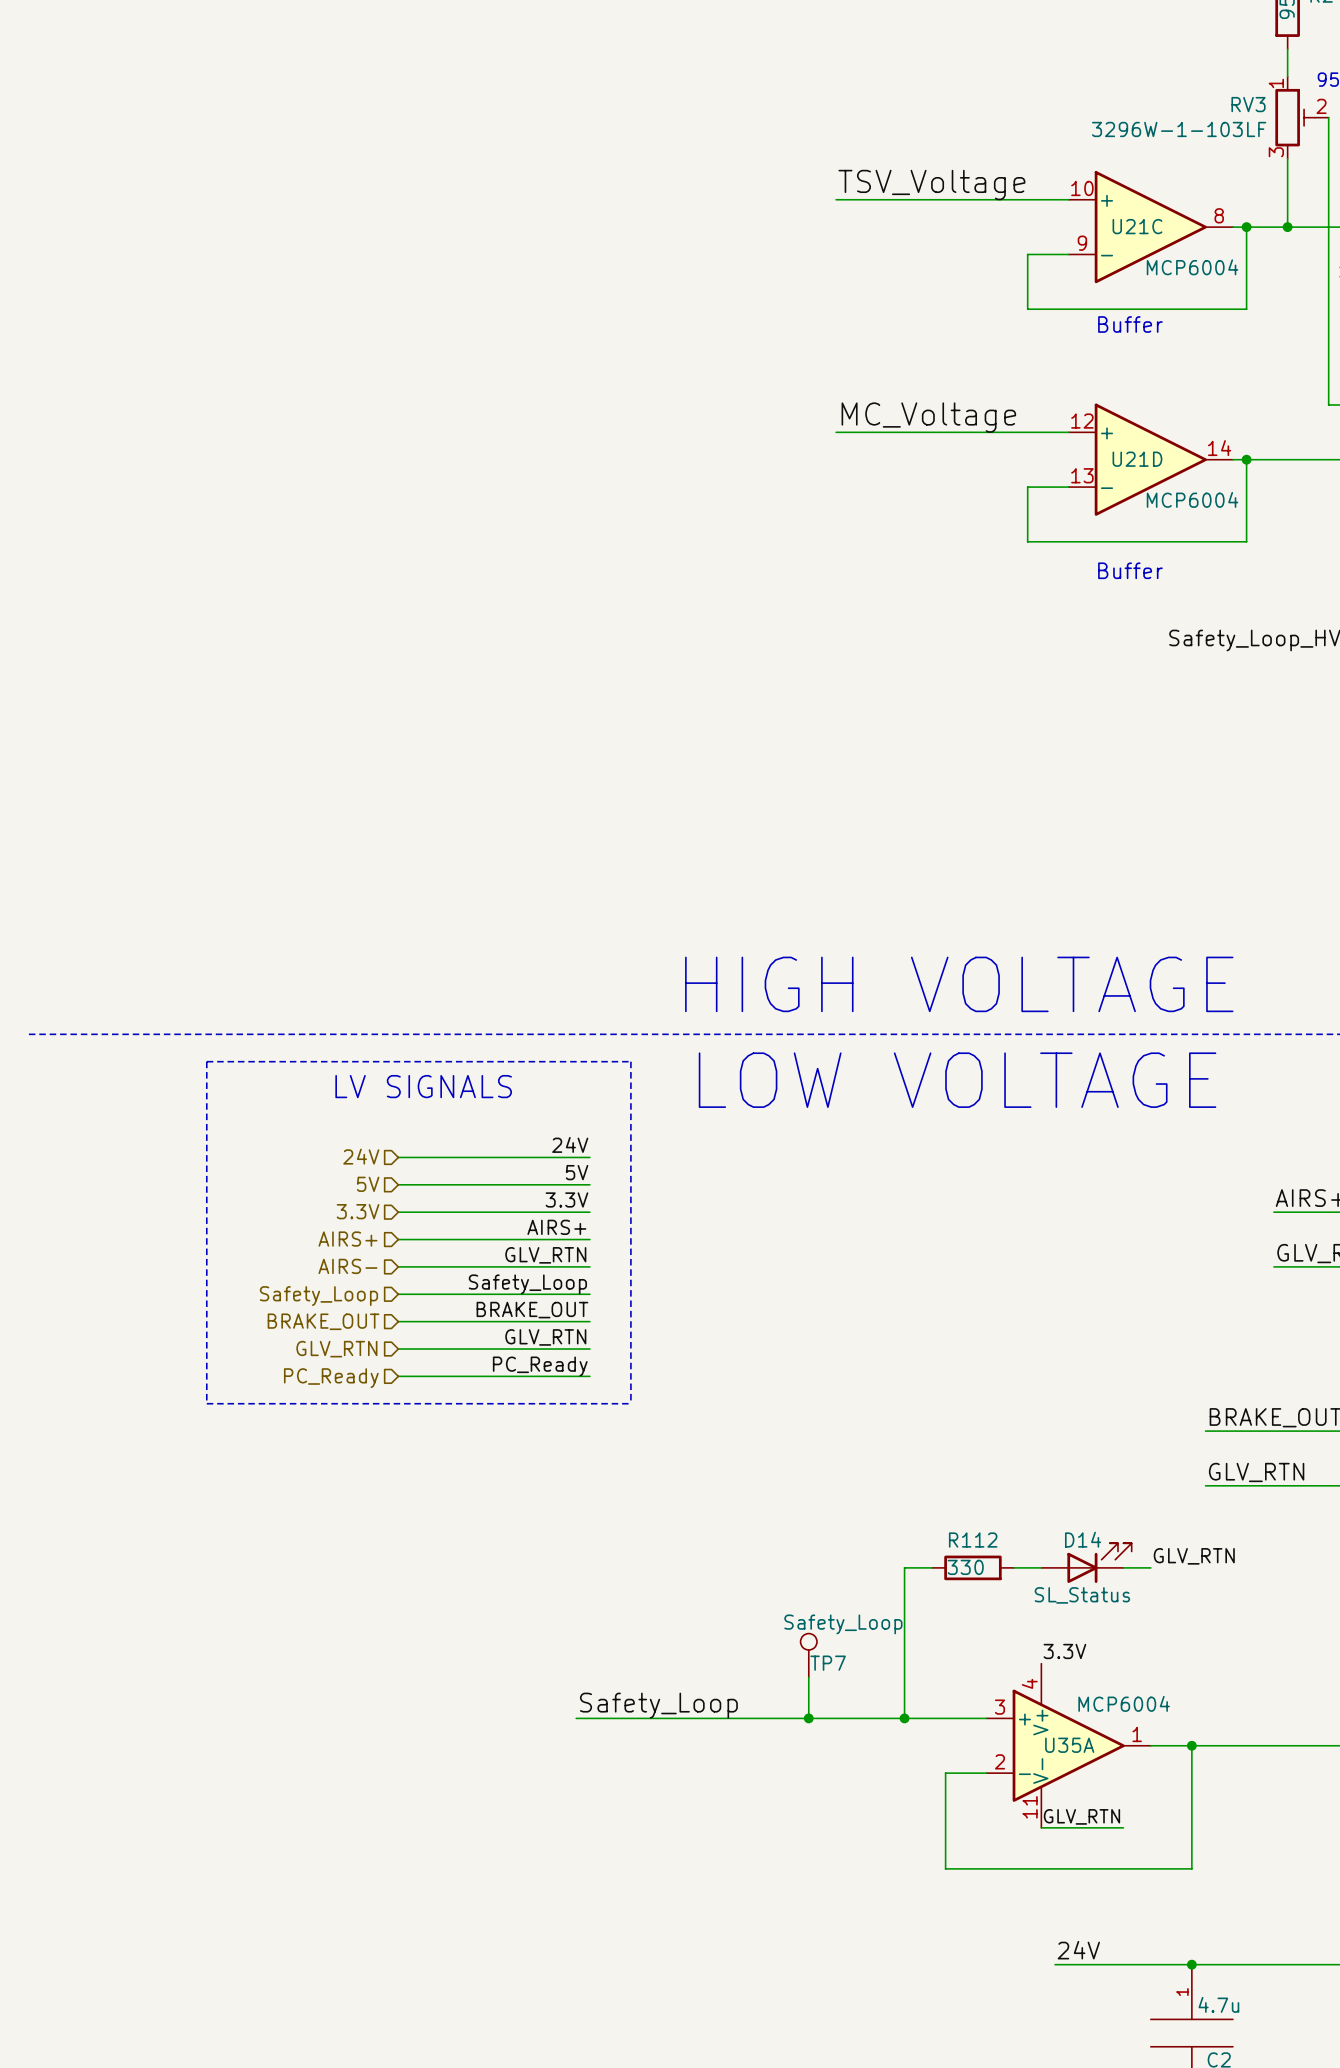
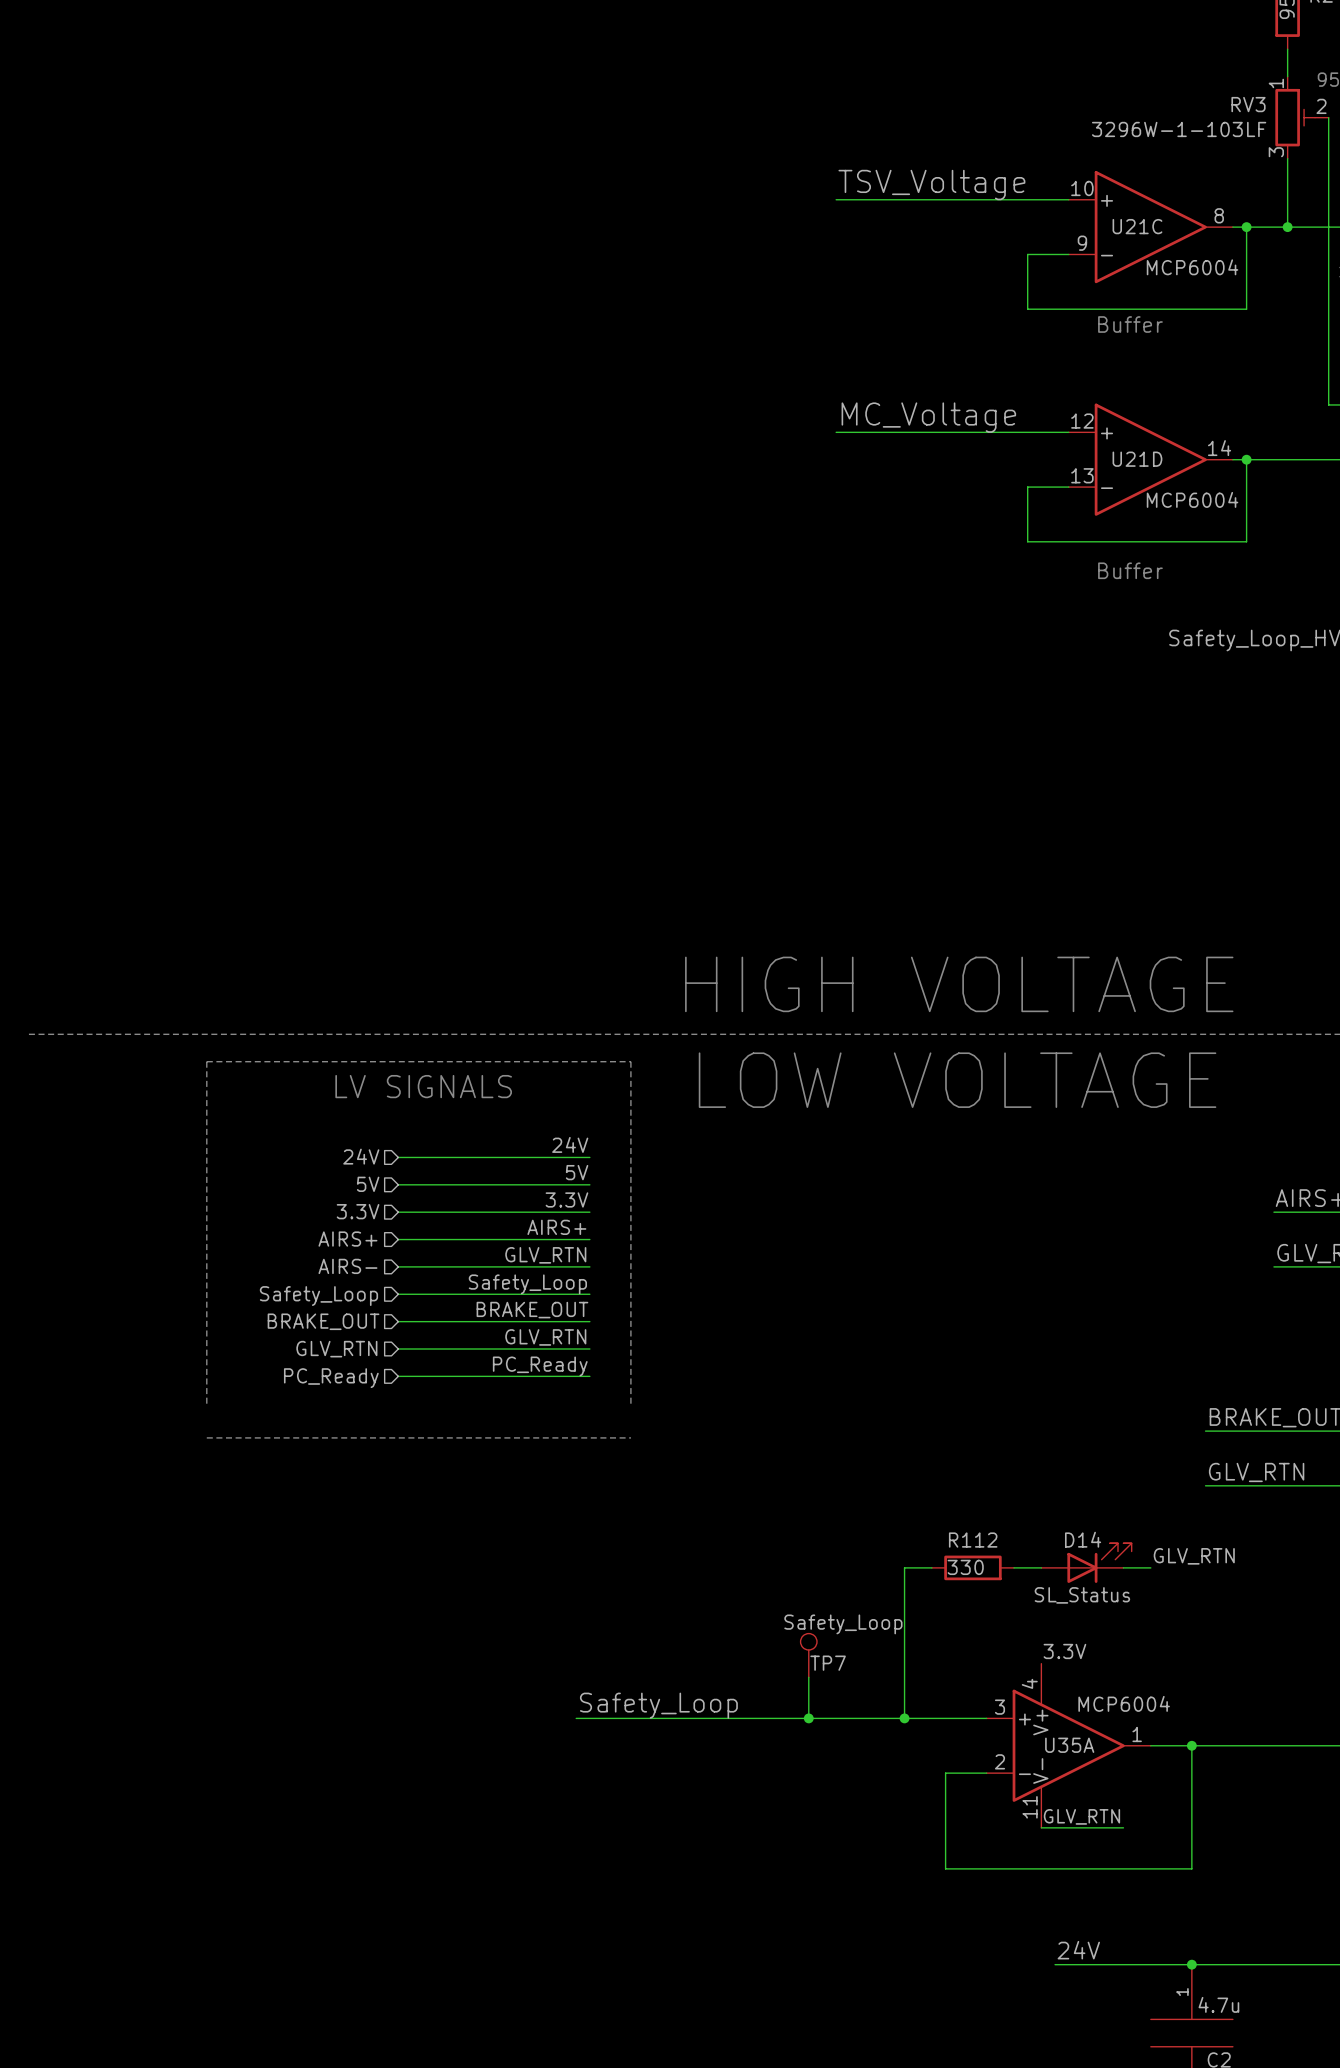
line: (206, 1403) (630, 1403) -> (206, 1437) (630, 1437)

